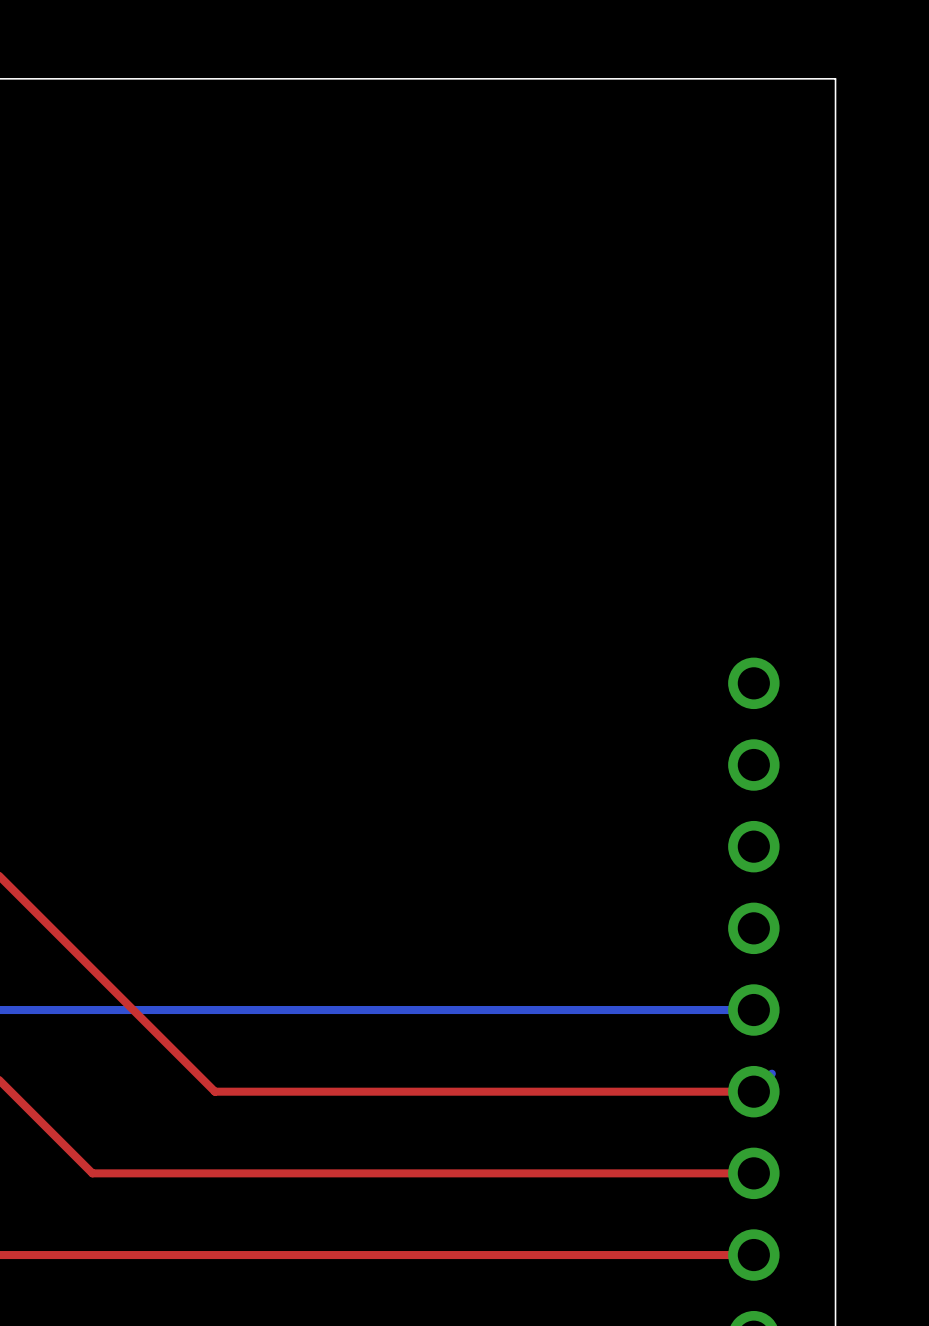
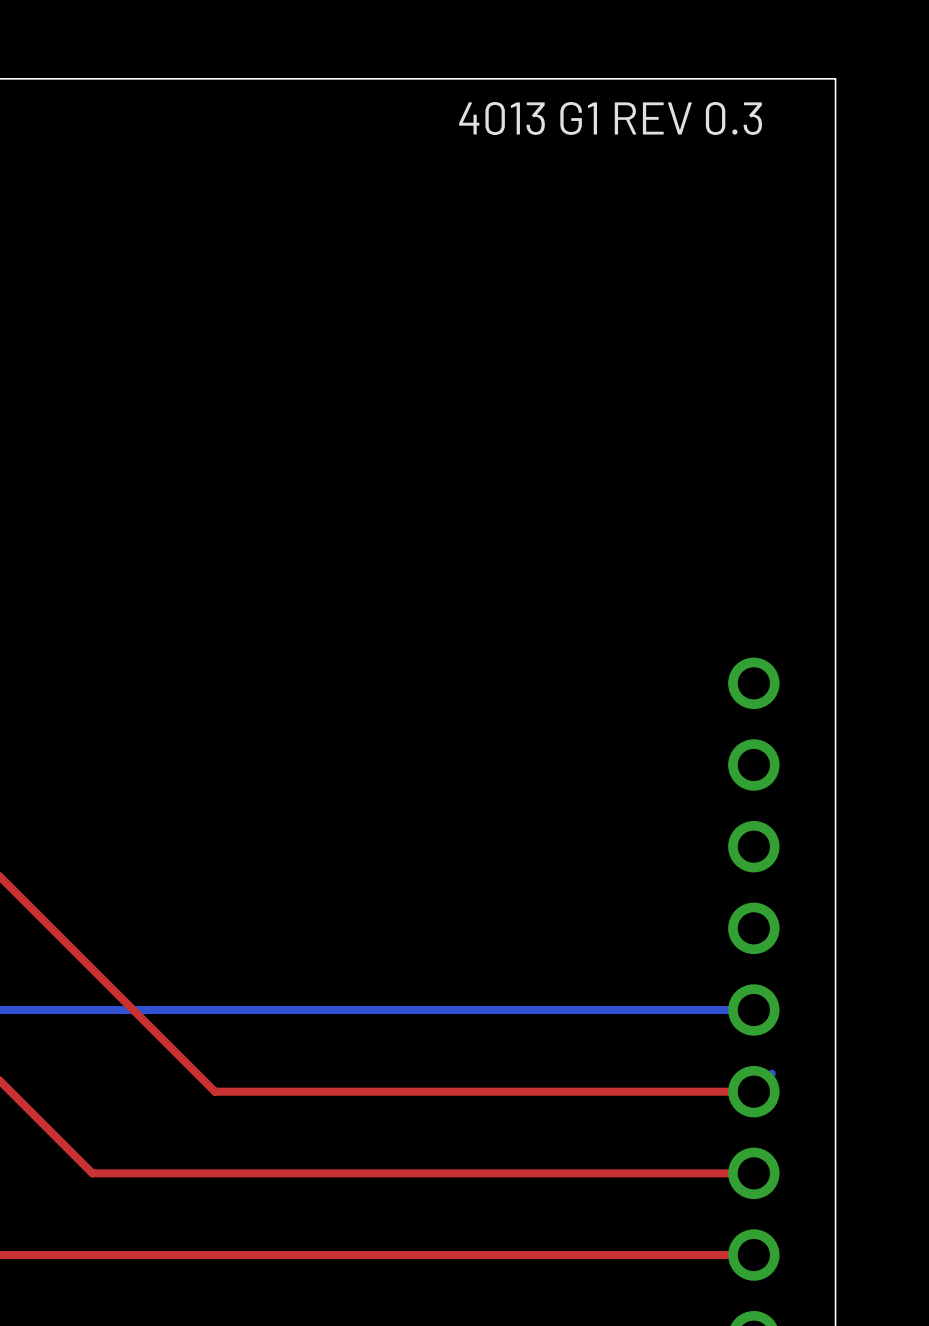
text: none -> 4013 G1 REV 0.3 (610, 118)

